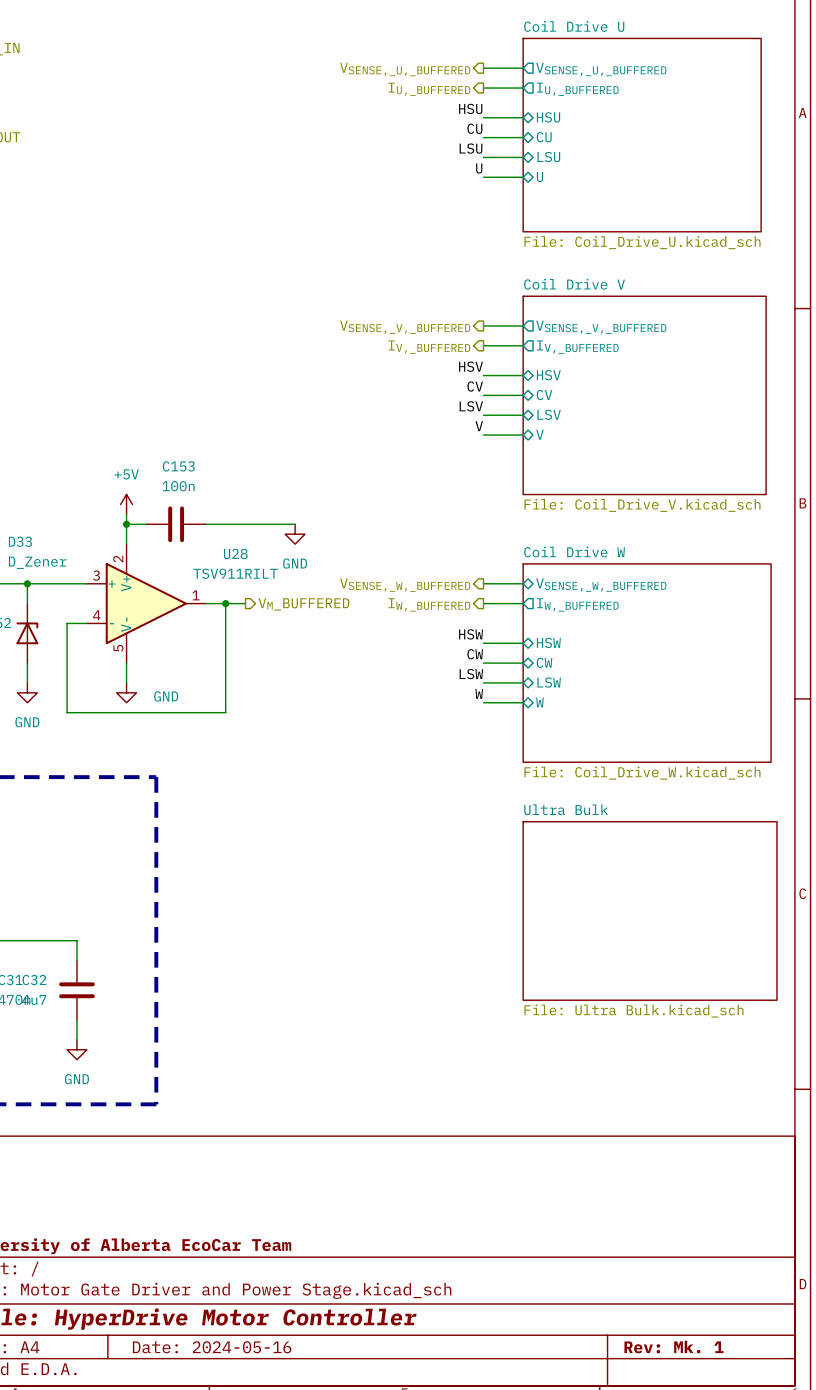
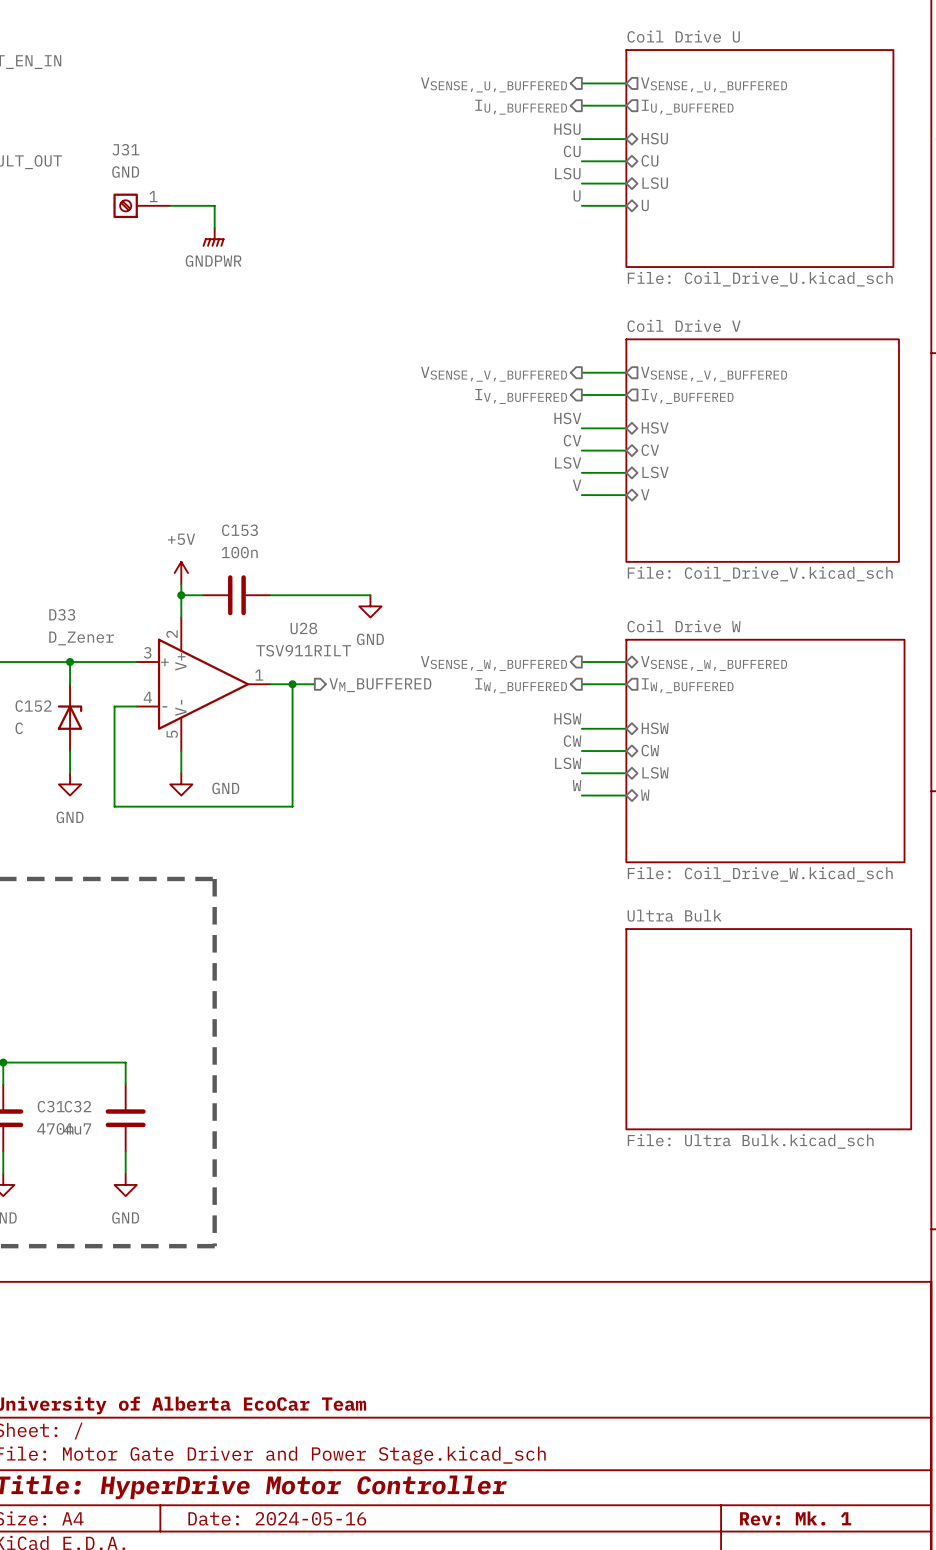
J31: none -> GND (141, 205)
wire: none -> (170, 205) (214, 205) (214, 228)
power symbol: none -> GNDPWR (213, 237)

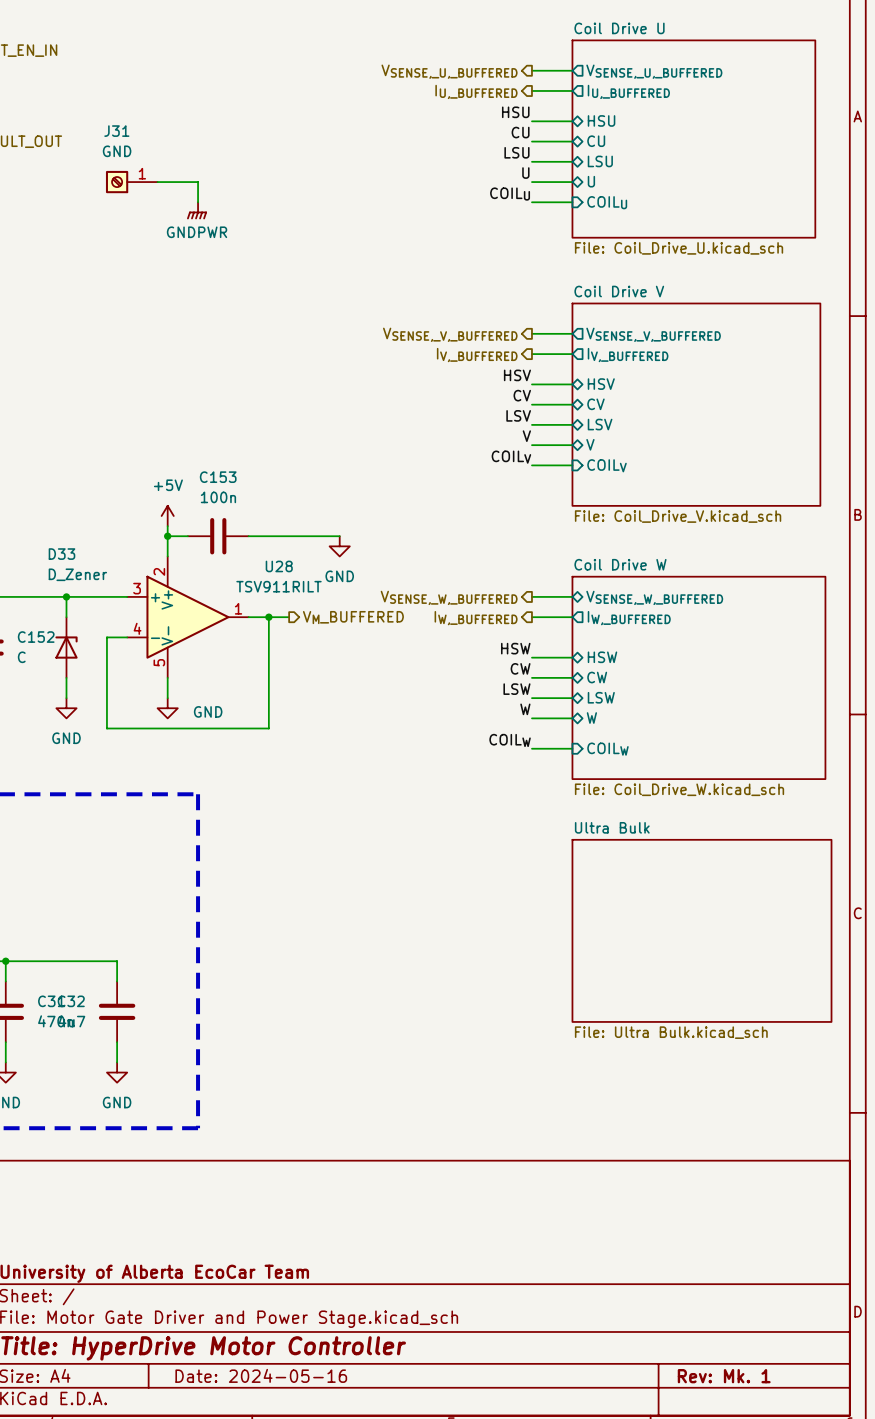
label: none -> COILU (510, 194)
wire: none -> (531, 202) (572, 202)
sheet pin: none -> COILU (607, 202)
label: none -> COILV (511, 457)
wire: none -> (531, 465) (572, 465)
sheet pin: none -> COILV (607, 465)
label: none -> COILW (510, 740)
wire: none -> (531, 748) (572, 748)
sheet pin: none -> COILW (607, 749)

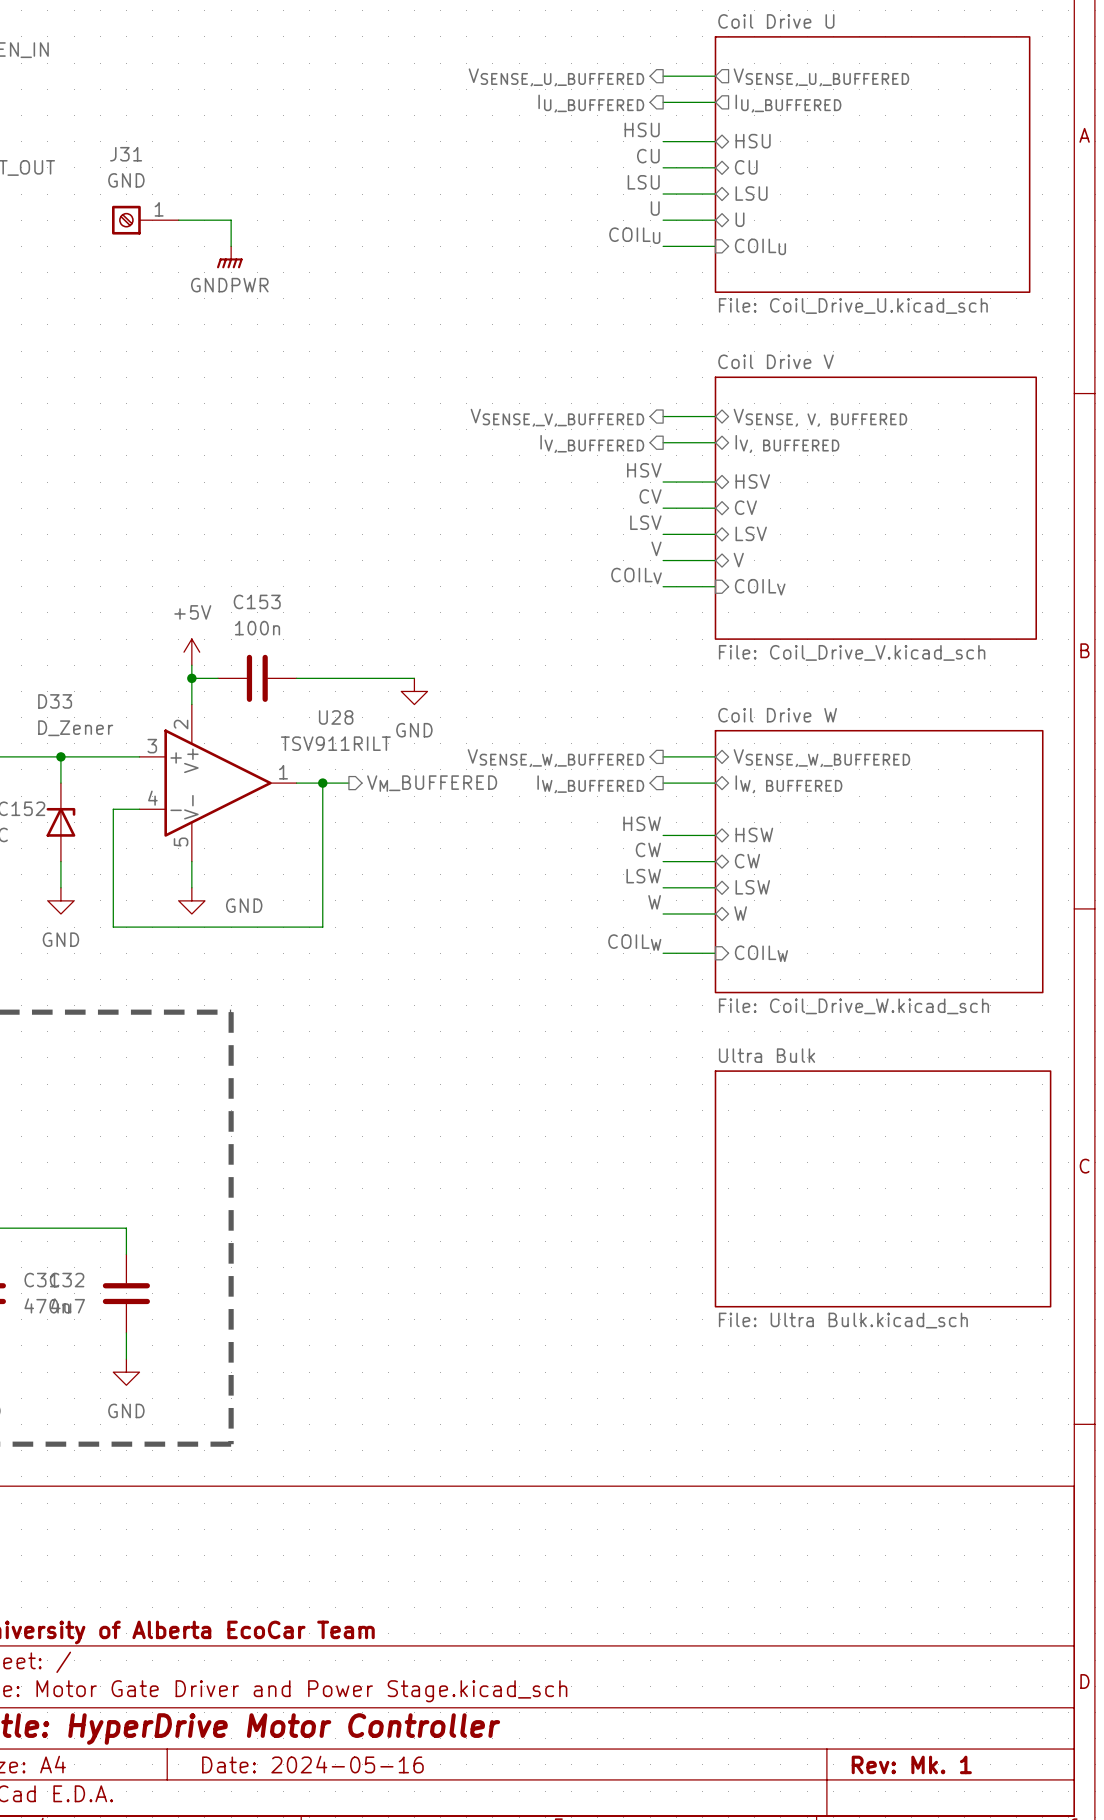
sheet pin shape: output (653, 334) -> bidirectional (820, 417)
sheet pin: VSENSE,_V,_BUFFERED (653, 334) -> VSENSE, V, BUFFERED (820, 417)
sheet pin shape: output (628, 355) -> bidirectional (787, 443)
sheet pin: IV,_BUFFERED (628, 355) -> IV, BUFFERED (787, 443)
sheet pin shape: output (629, 618) -> bidirectional (788, 784)
sheet pin: IW,_BUFFERED (629, 618) -> IW, BUFFERED (788, 784)

